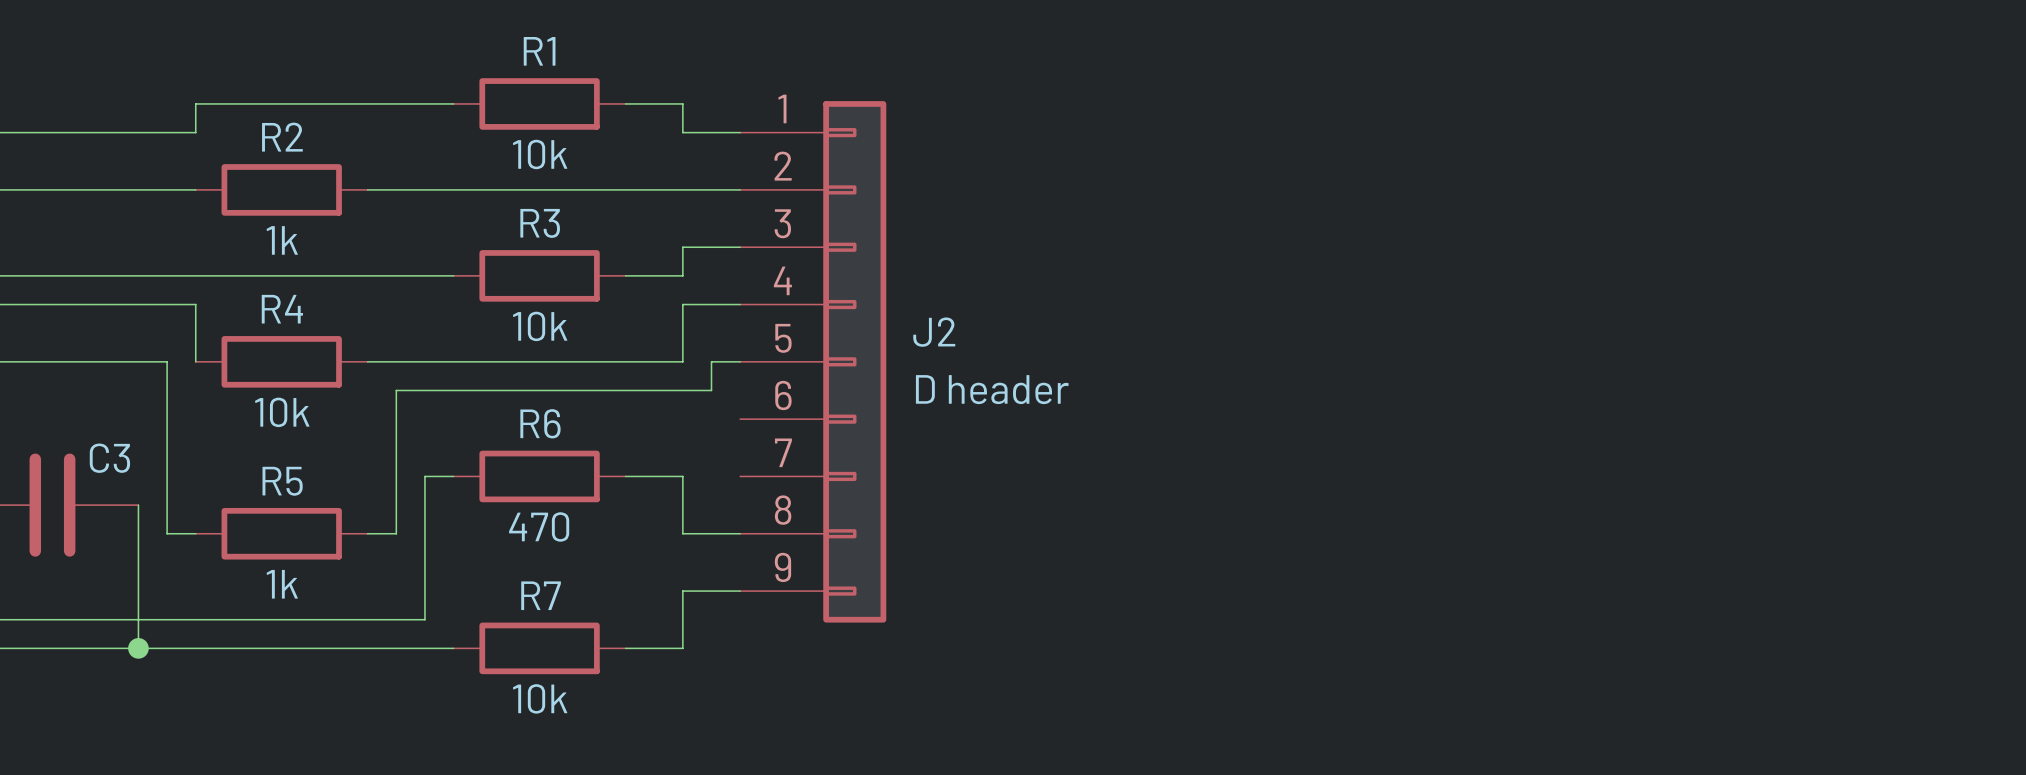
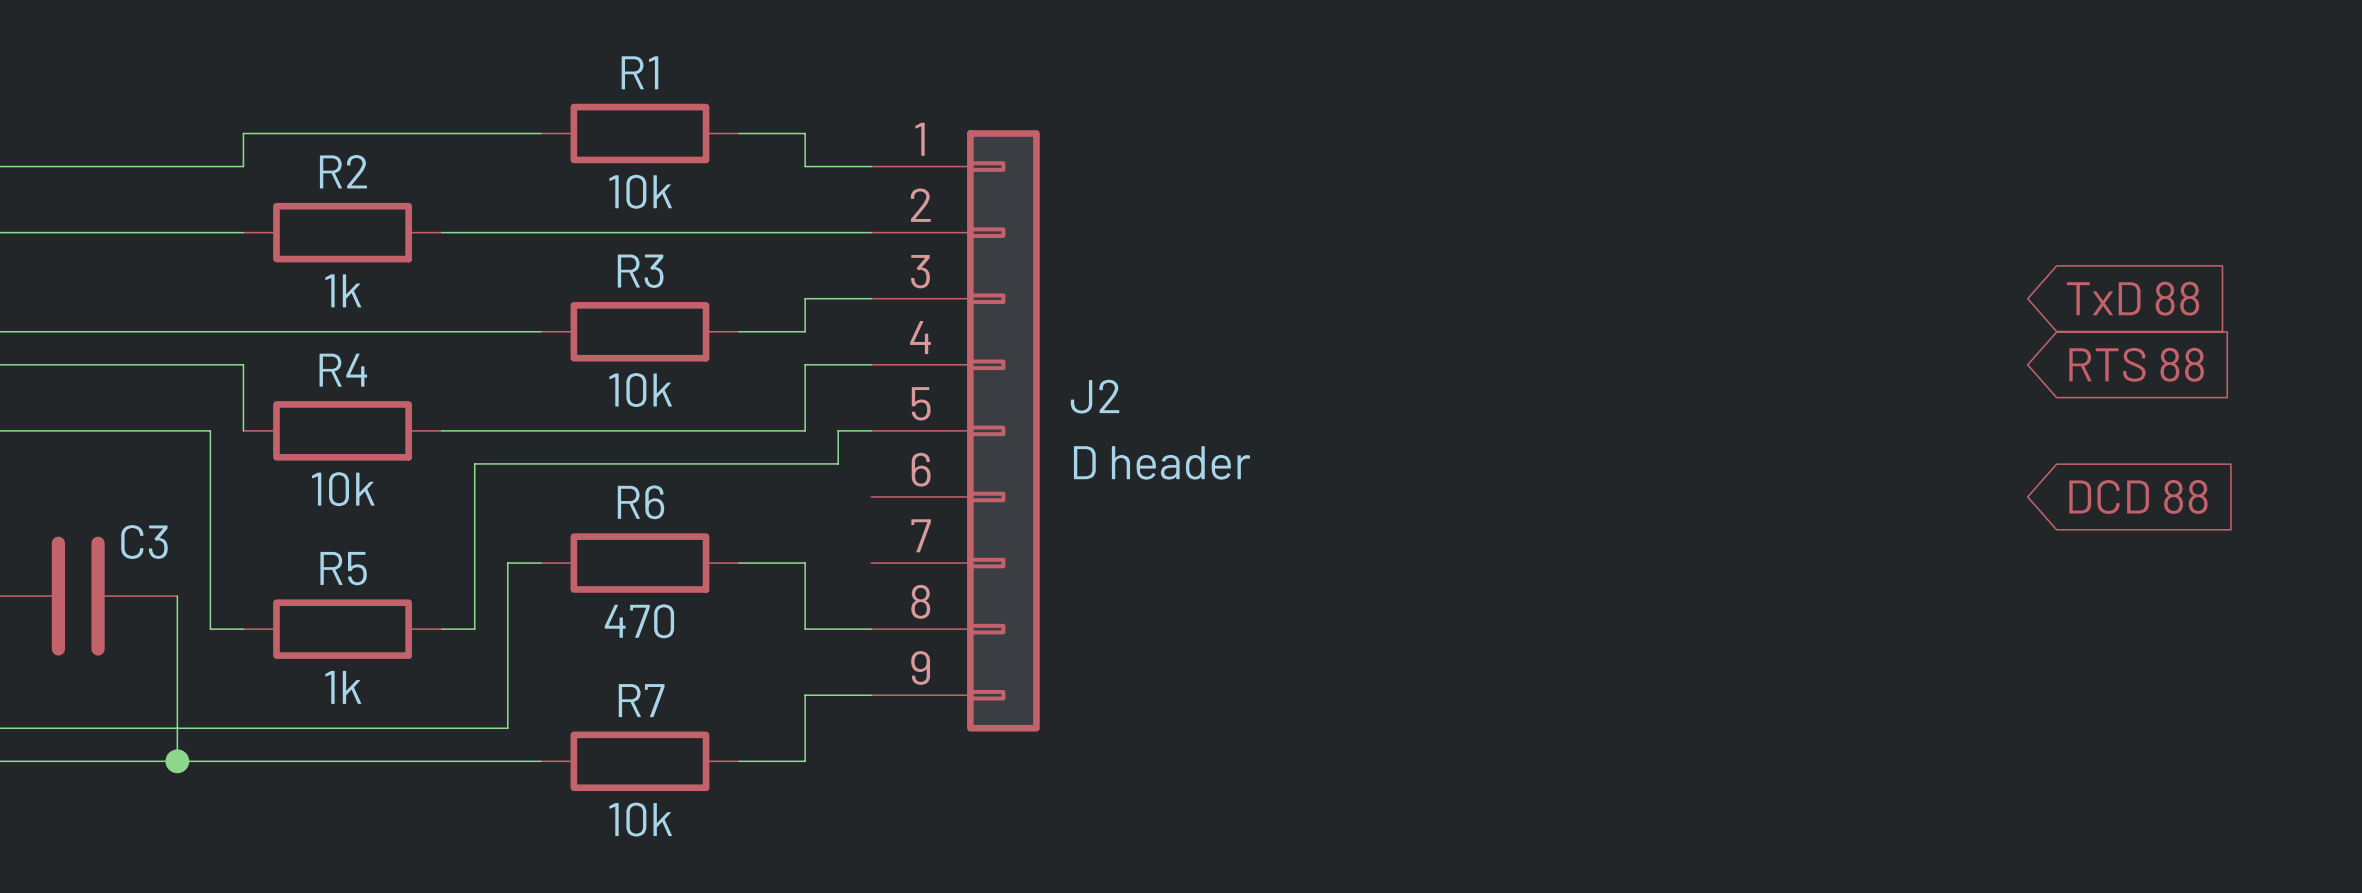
global label: none -> TxD 88 (2133, 298)
global label: none -> RTS 88 (2136, 364)
global label: none -> DCD 88 (2138, 496)

